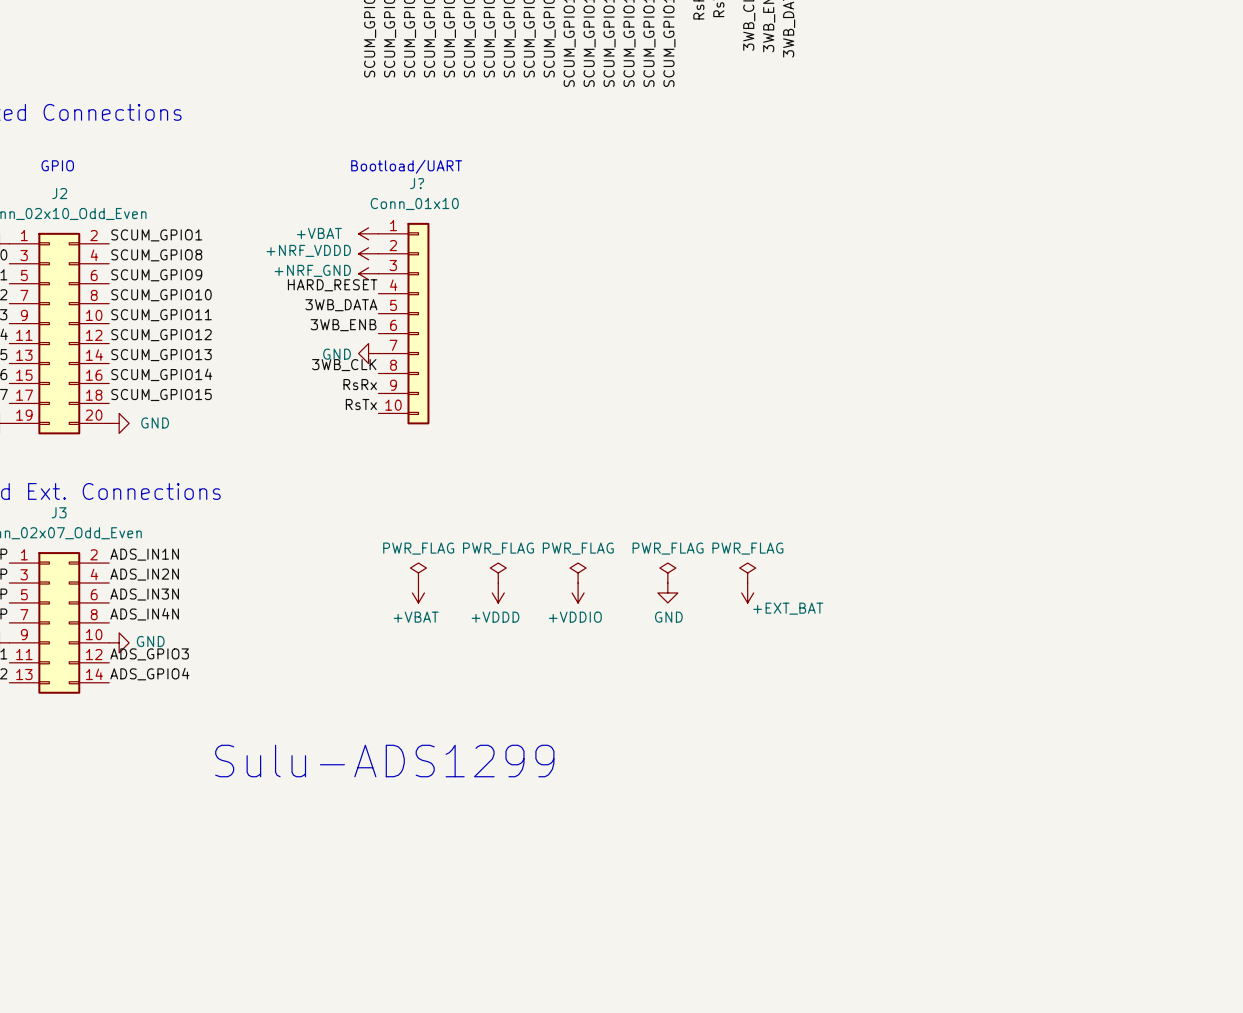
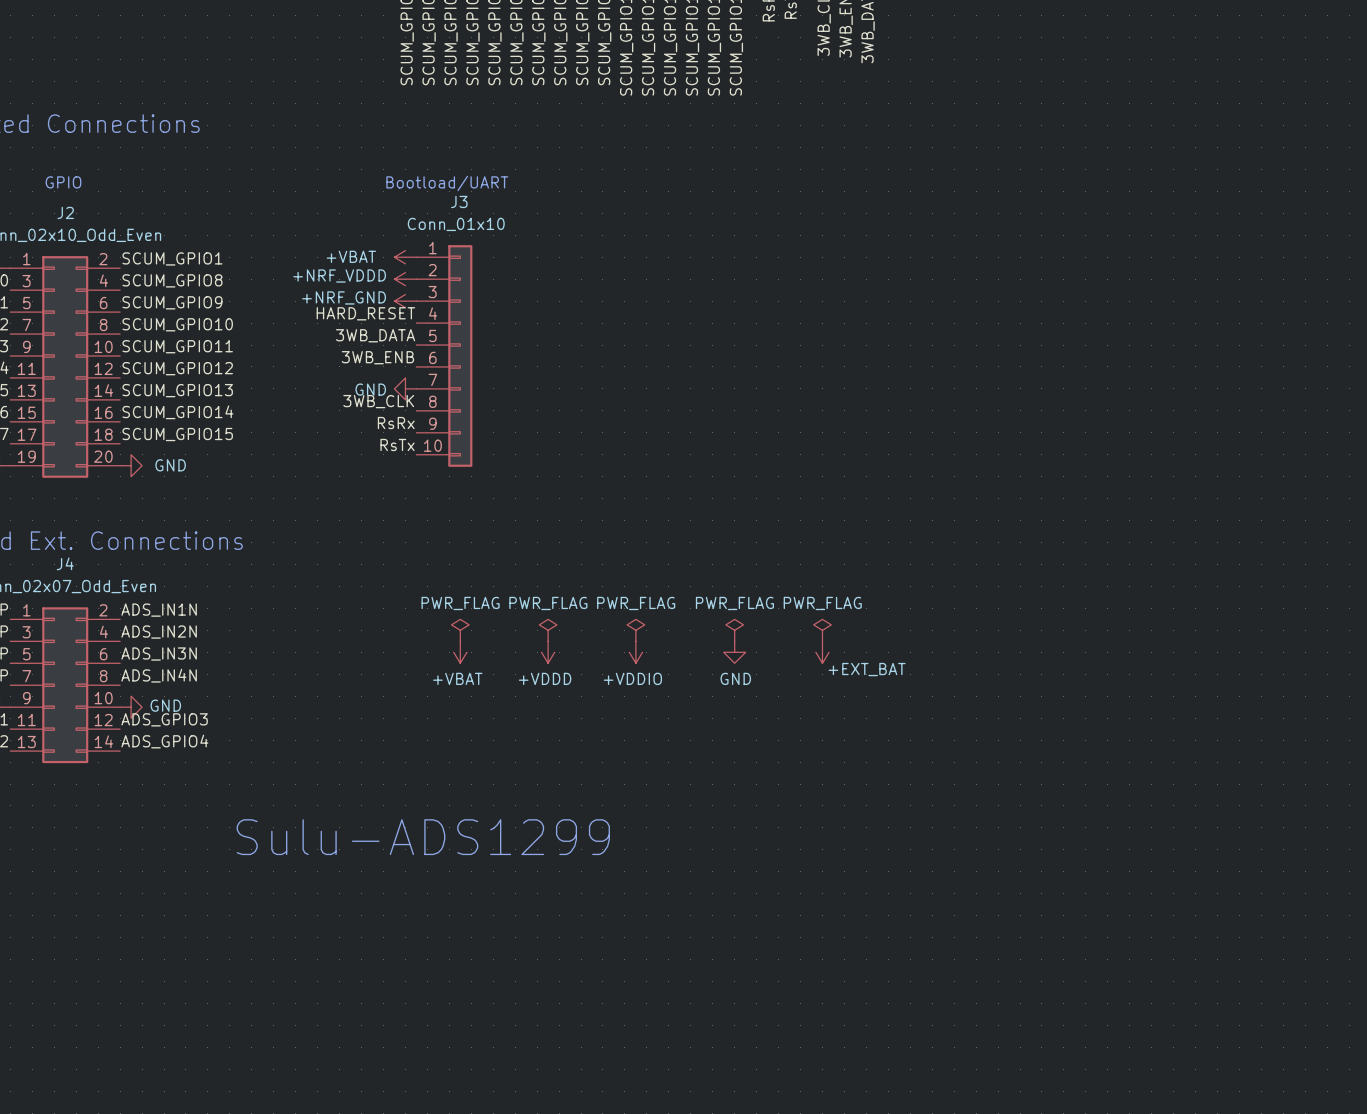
J? name: J? (417, 183) -> J3 (459, 201)
J3 name: J3 (59, 512) -> J4 (65, 563)

